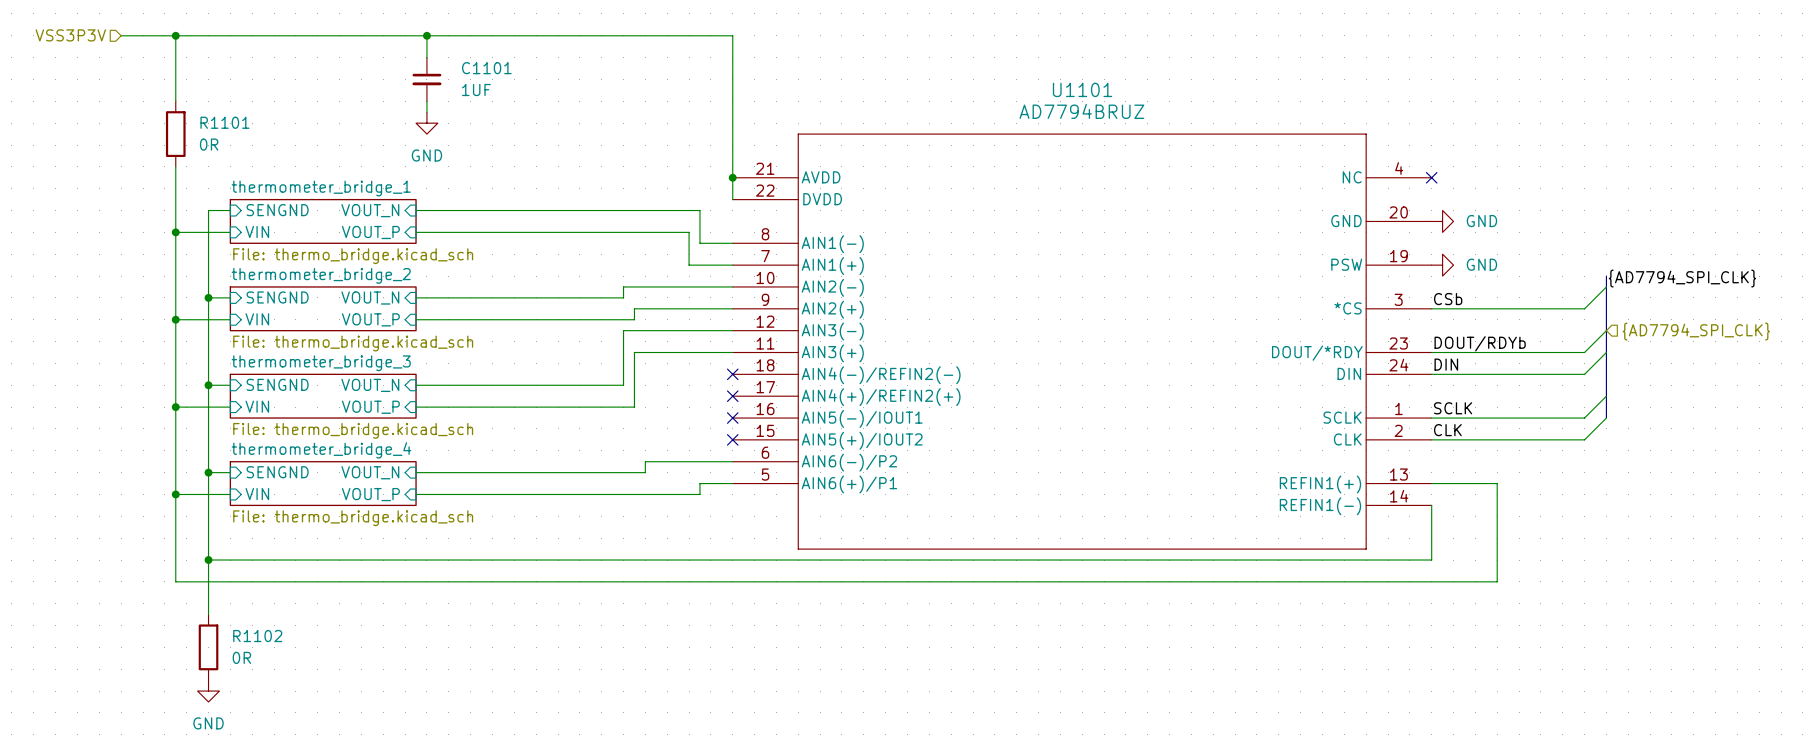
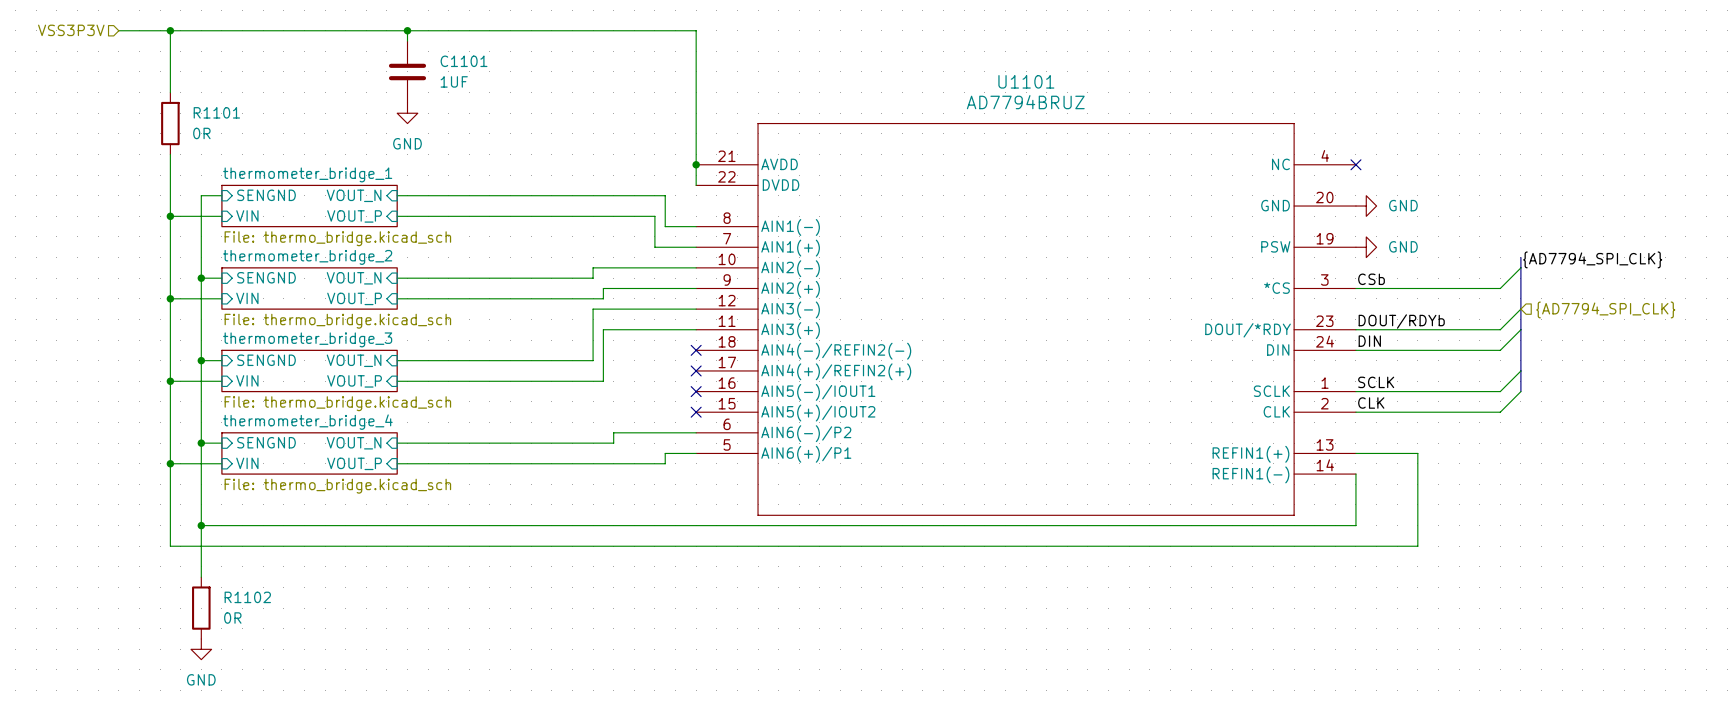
C1101 symbol: [412, 57, 442, 102] -> [388, 41, 427, 103]

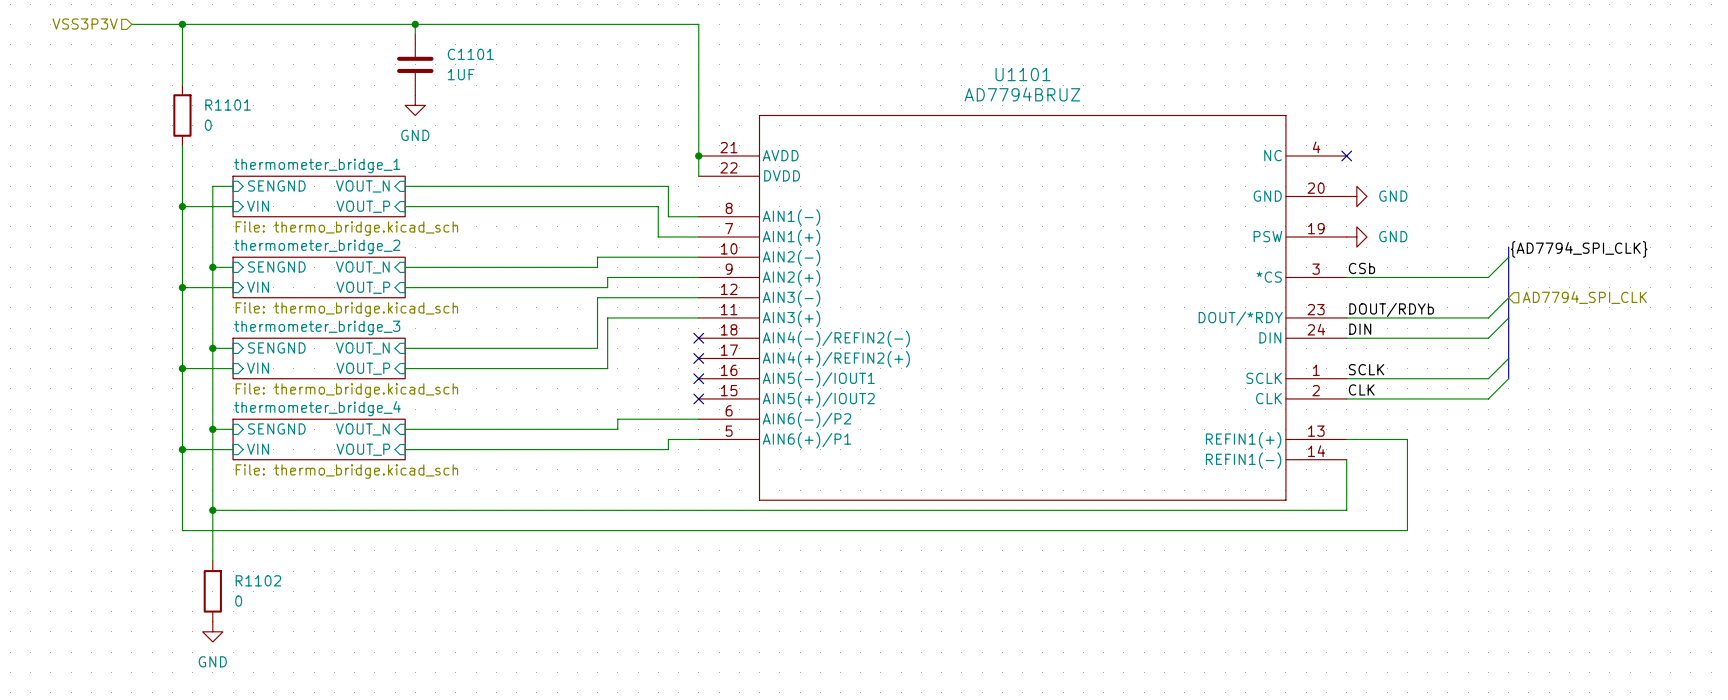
R1101 value: 0R (201, 133) -> 0 (208, 125)
hierarchical label: {AD7794_SPI_CLK} (1605, 309) -> AD7794_SPI_CLK (1584, 297)
R1102 value: 0R (232, 618) -> 0 (238, 601)

